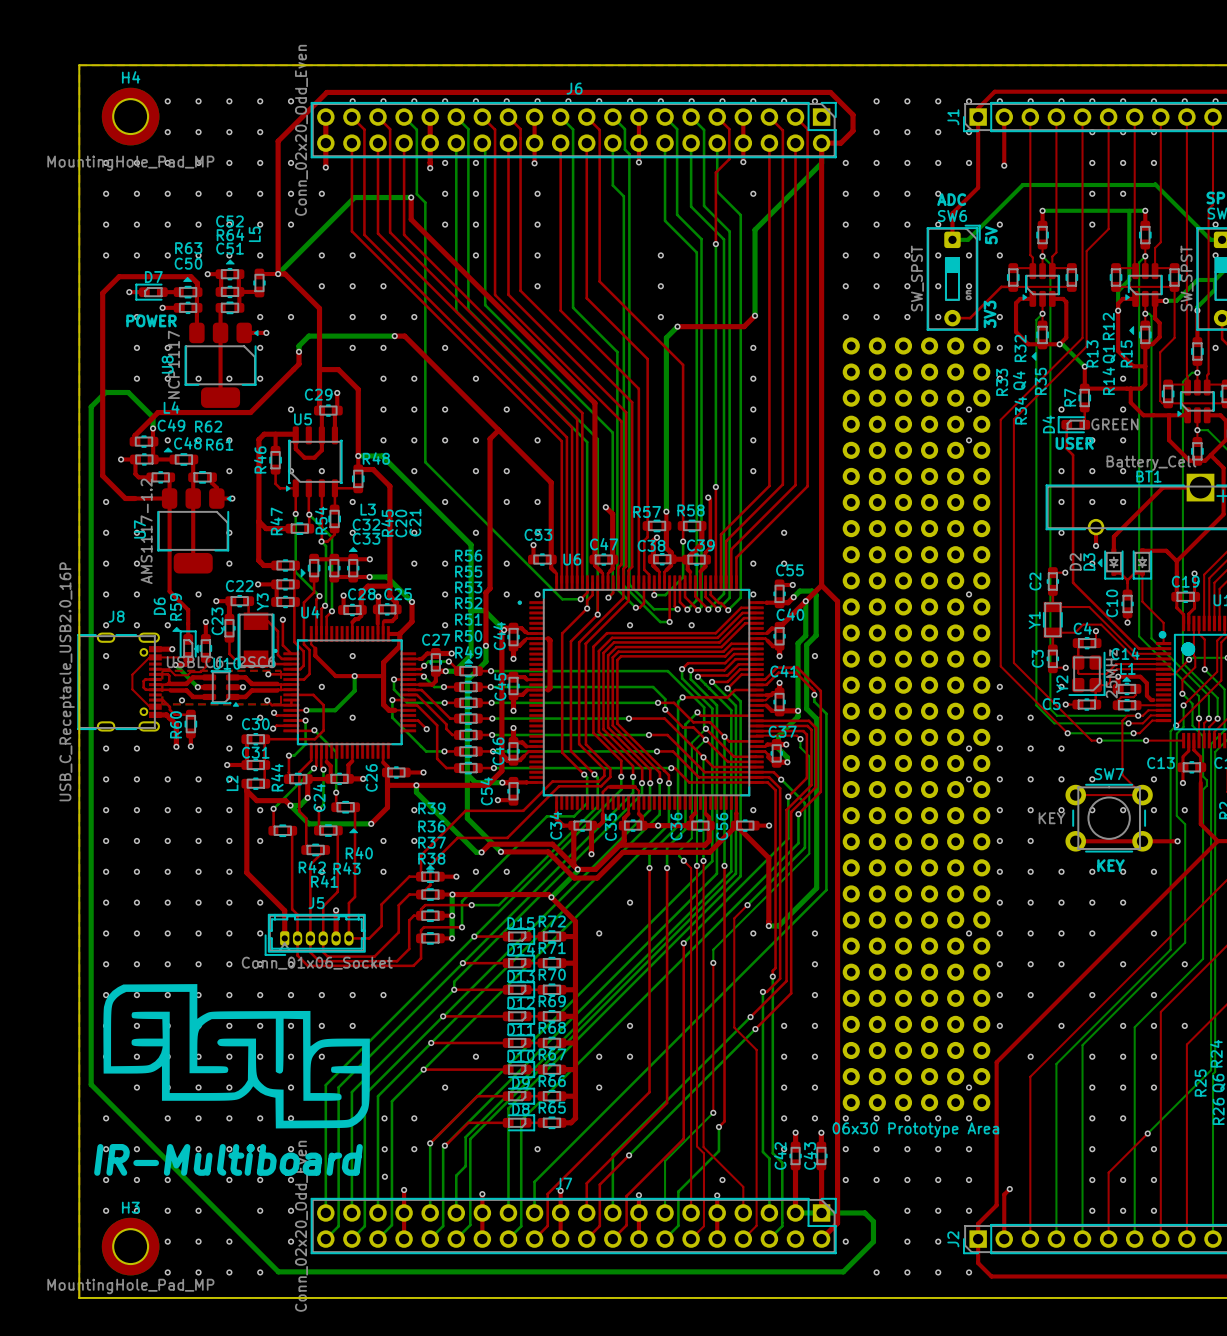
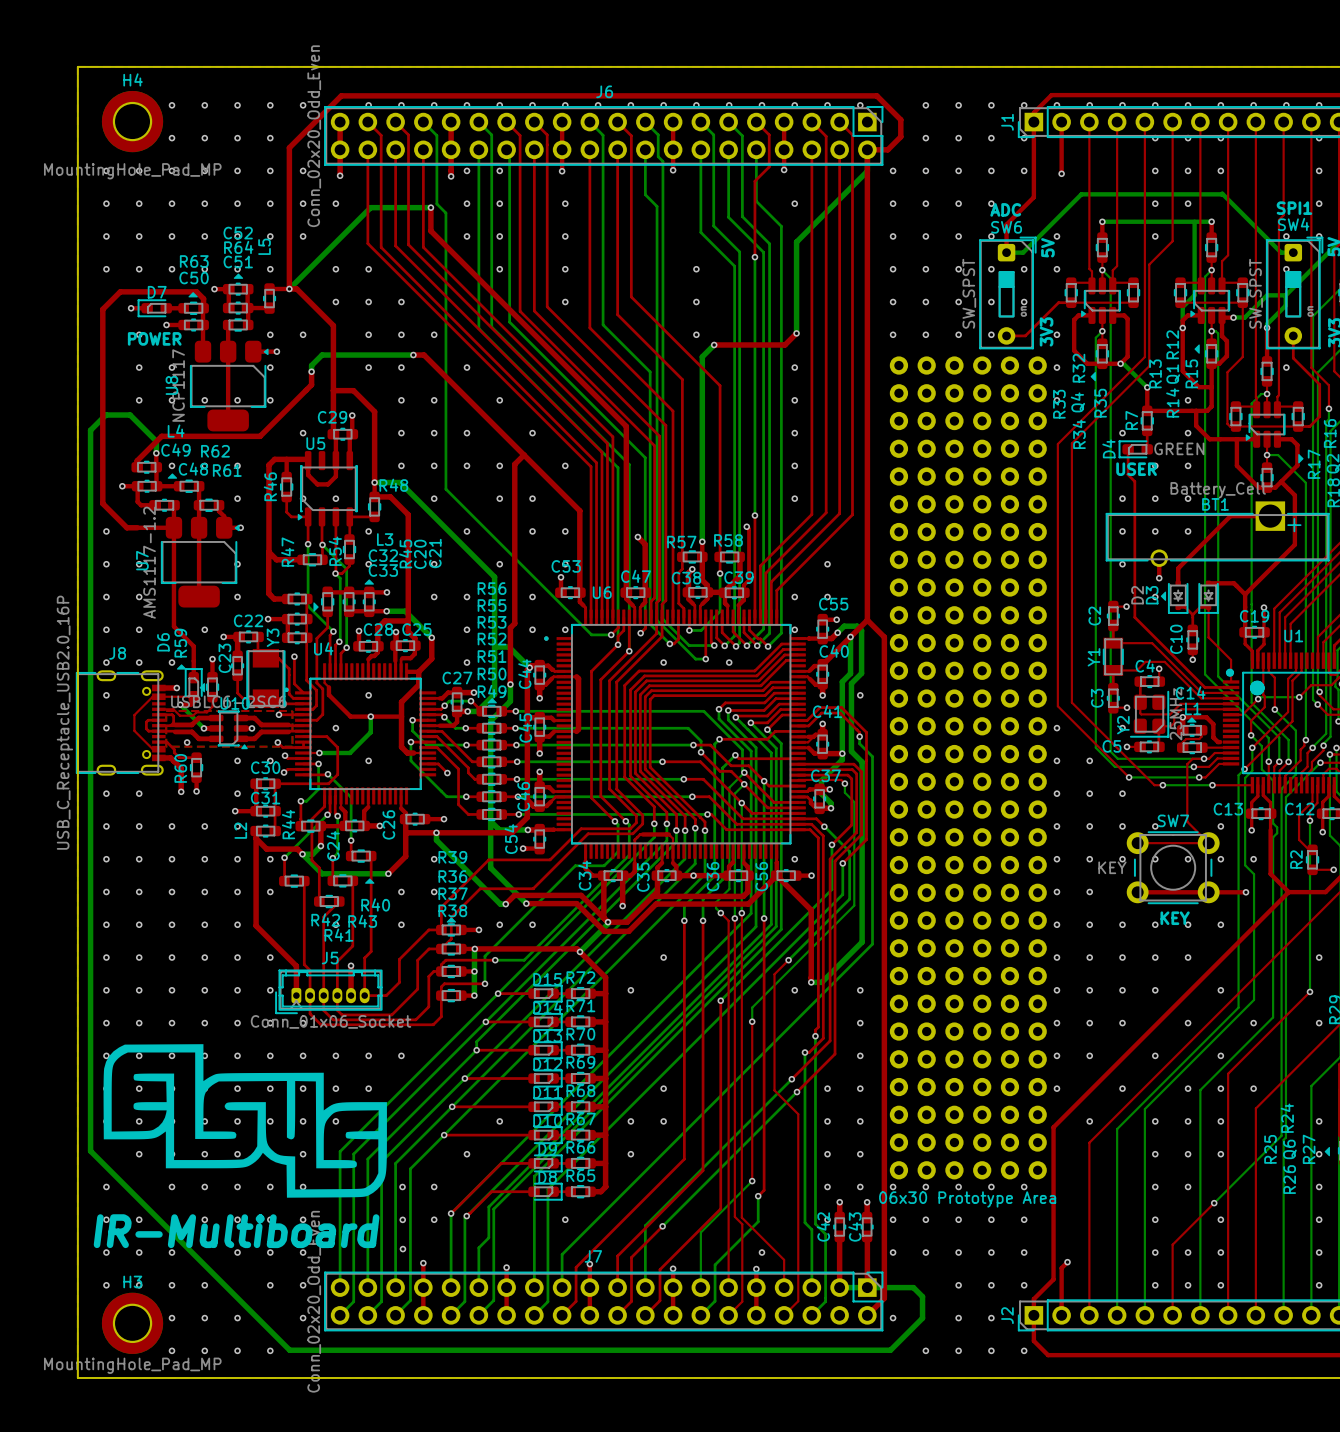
via: (969, 409) -> none
via: (969, 440) -> none
via: (969, 594) -> none
via: (969, 748) -> none
via: (969, 779) -> none
via: (969, 933) -> none
via: (969, 1087) -> none

